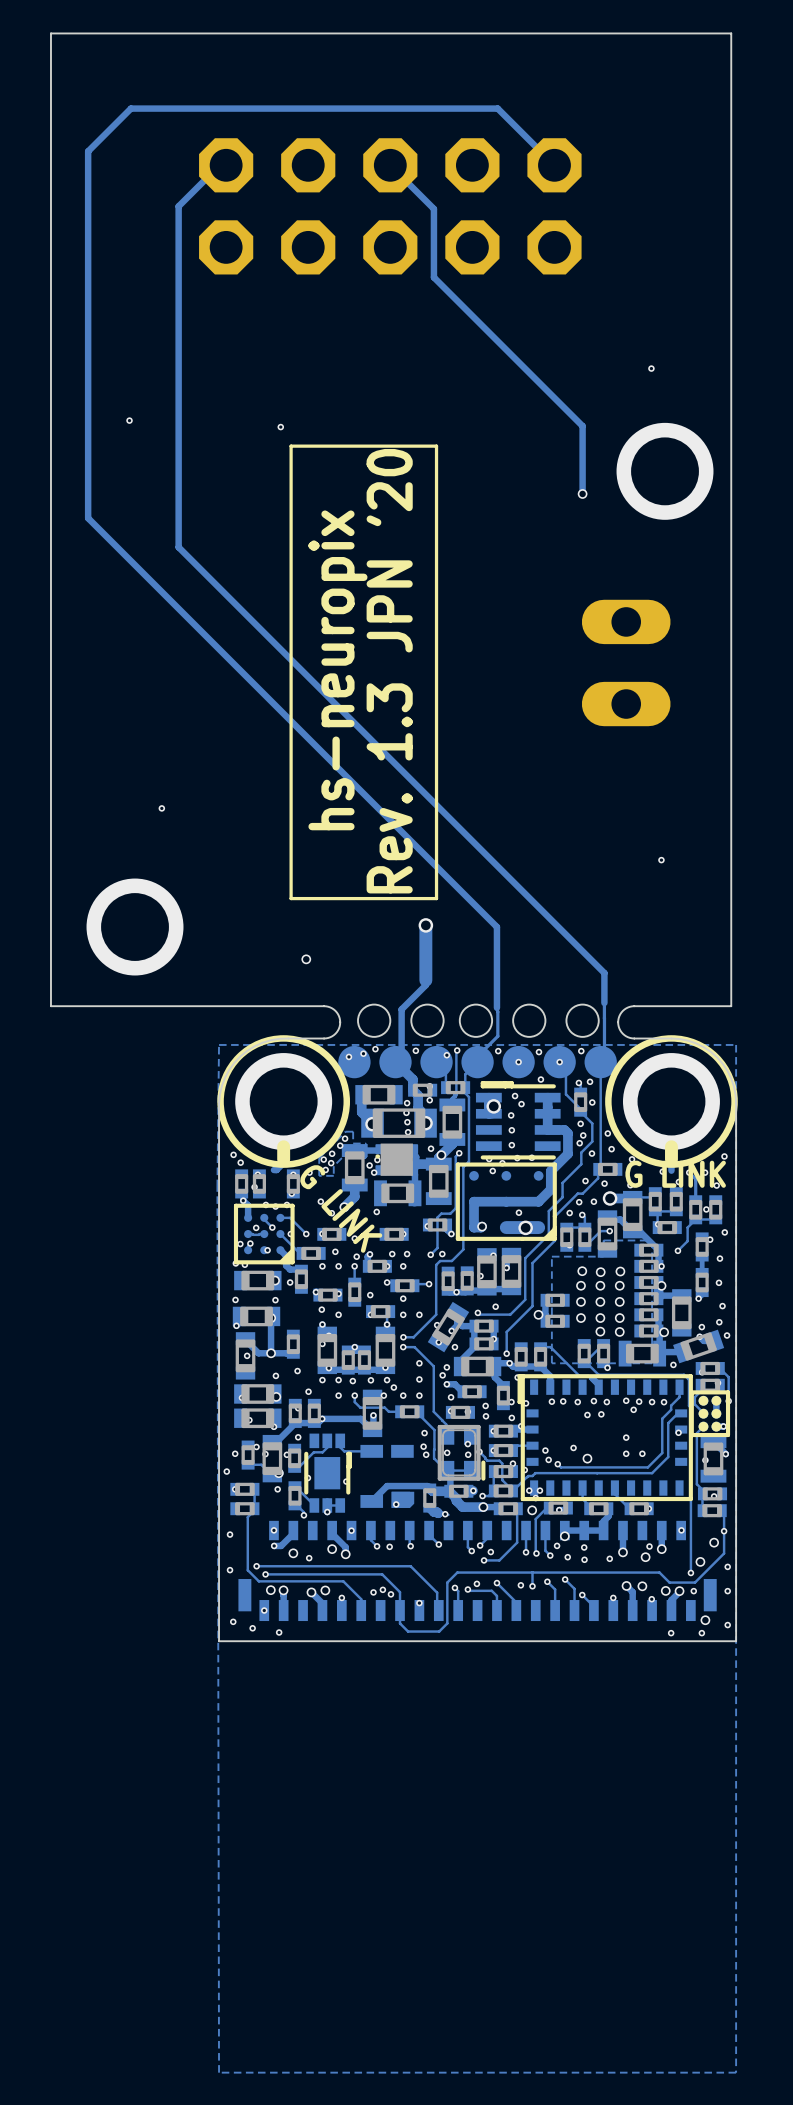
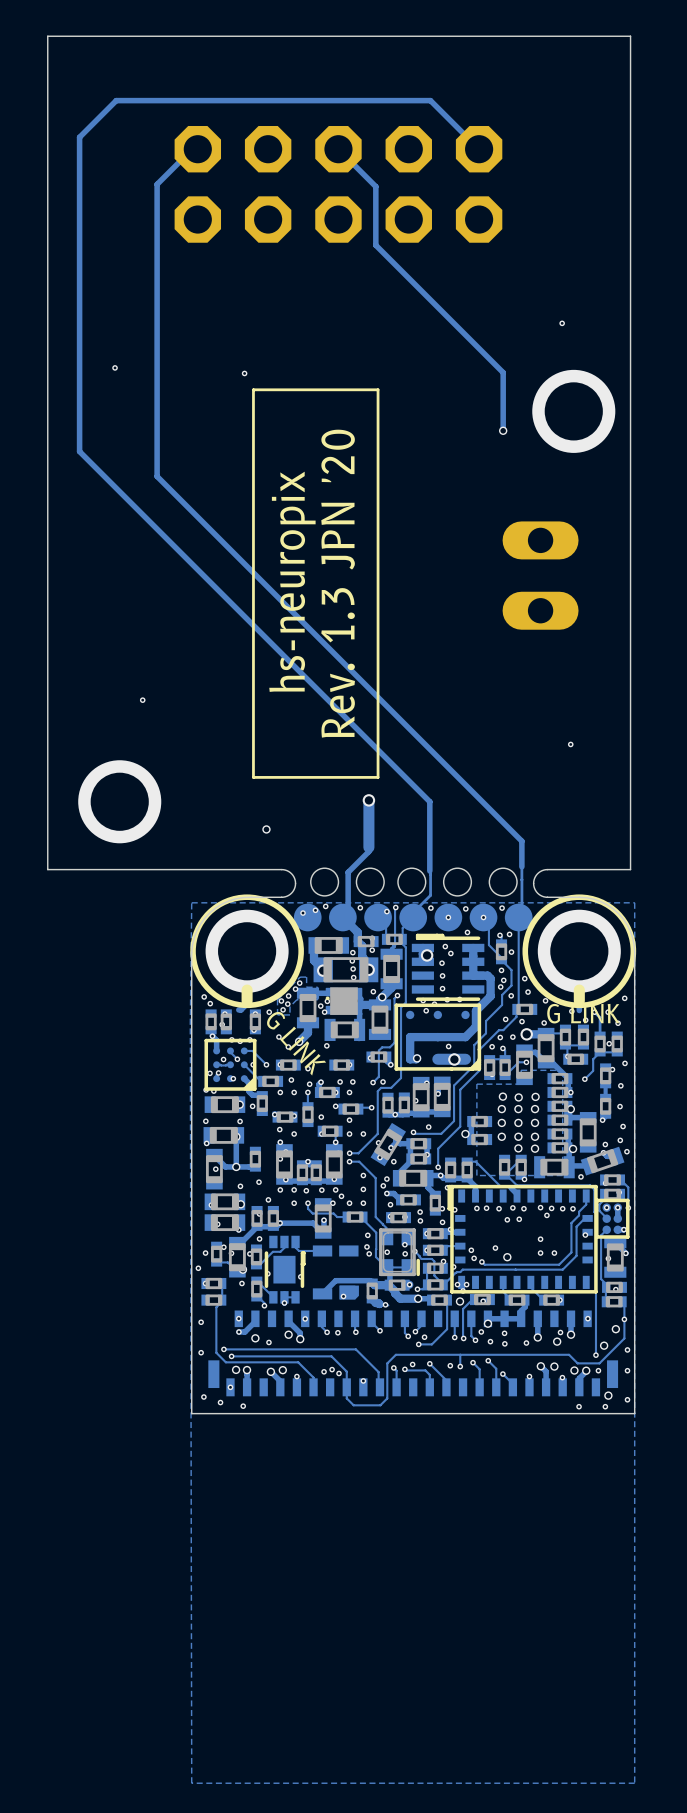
part footprint: [689, 1390, 731, 1438] -> [595, 1198, 630, 1239]

